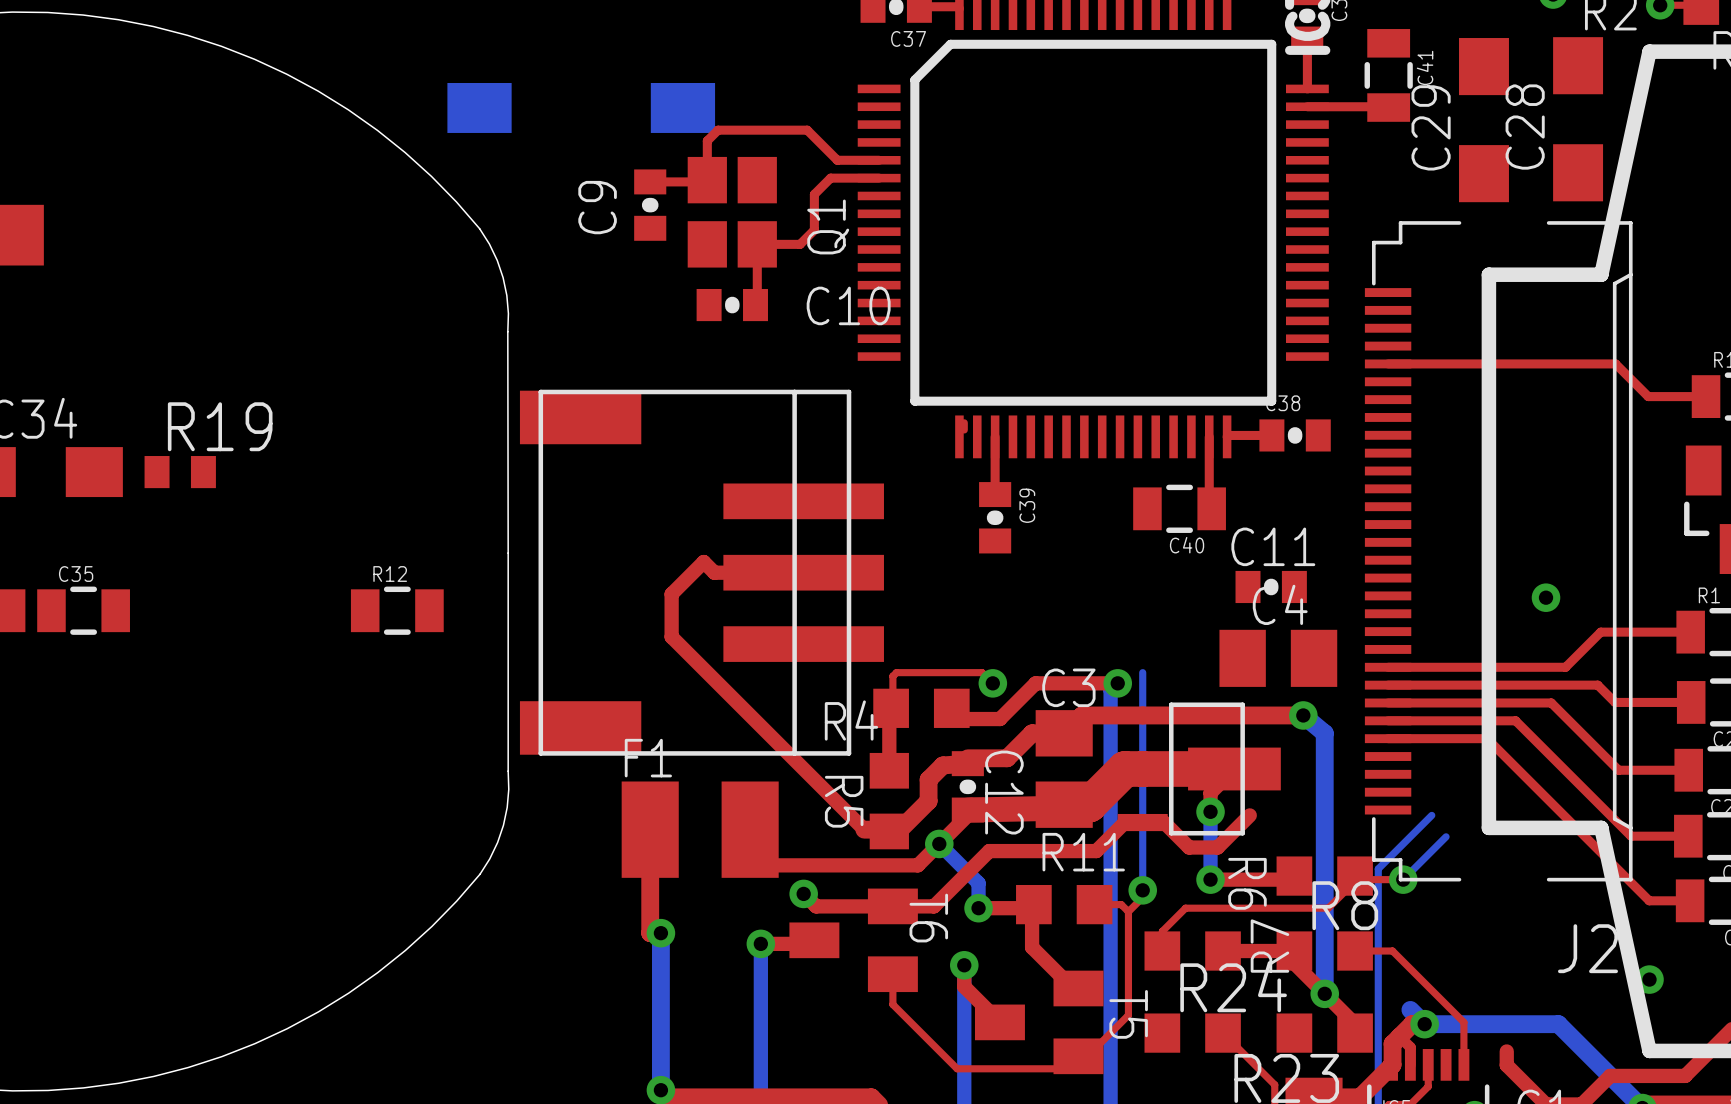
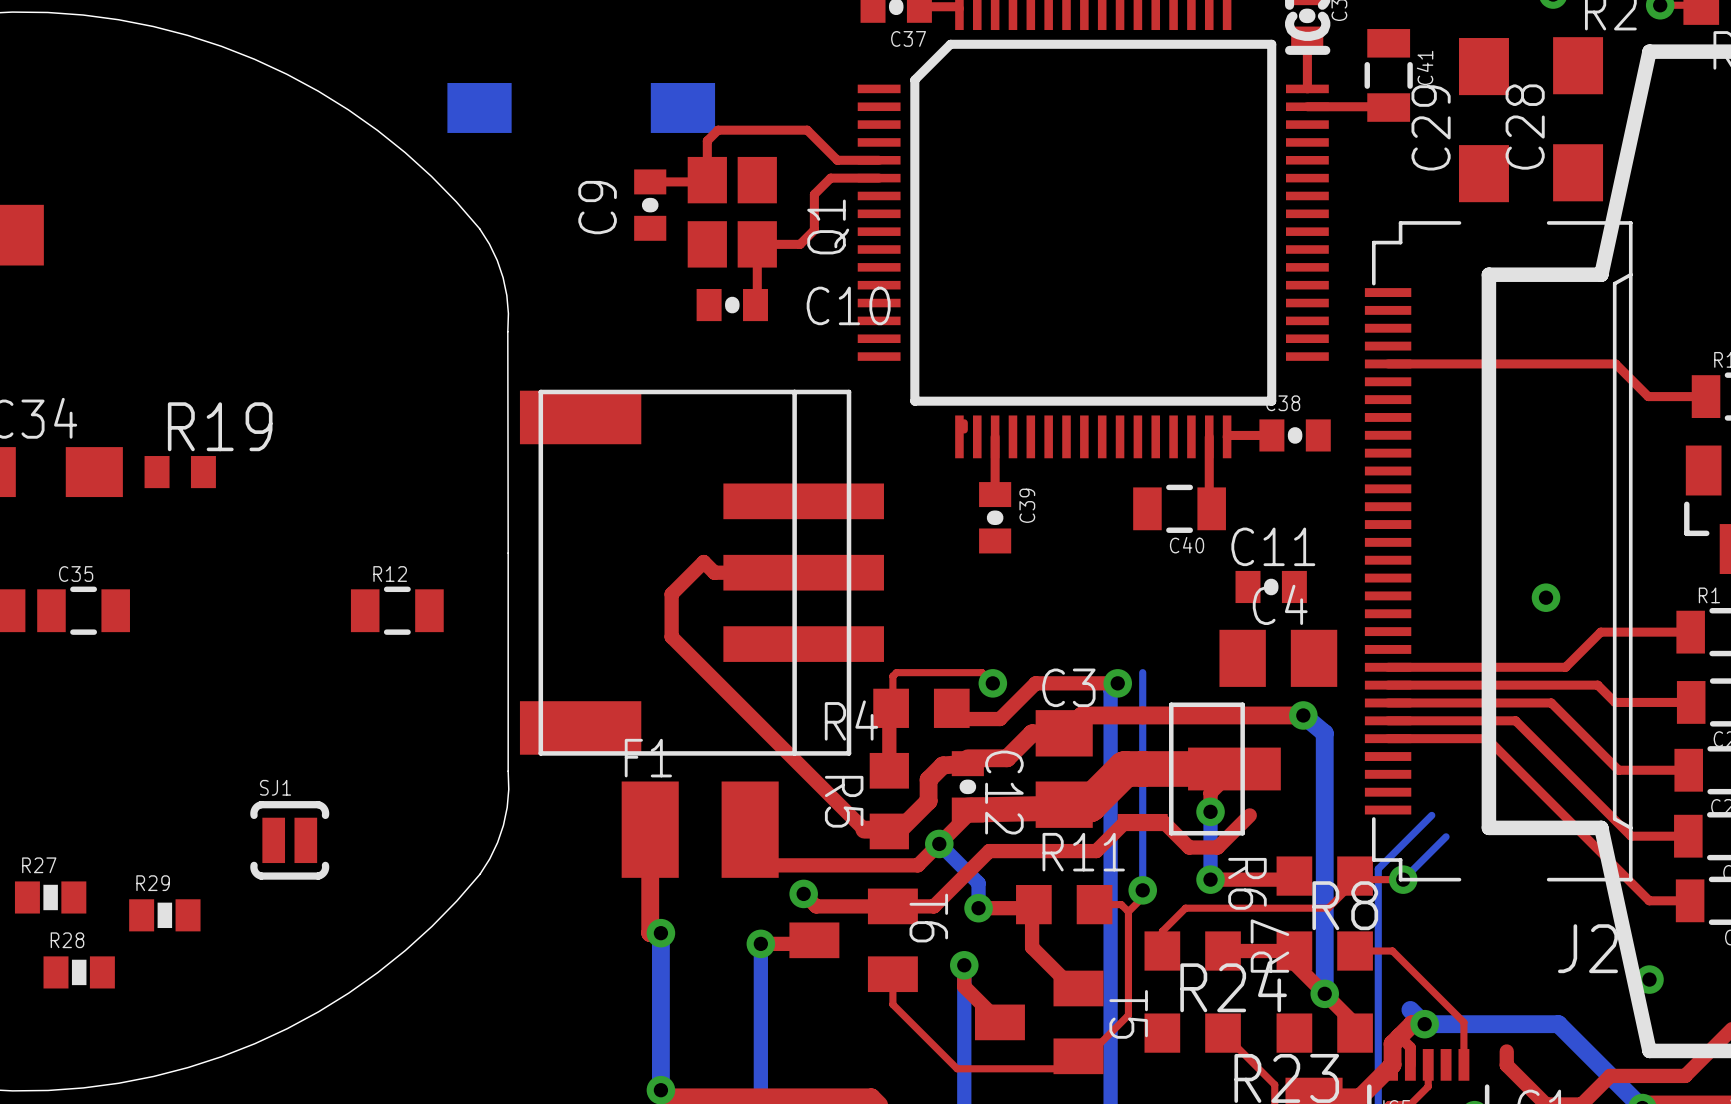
SJ1: none -> (289, 840)
R27: none -> (50, 897)
R29: none -> (164, 915)
R28: none -> (79, 972)

